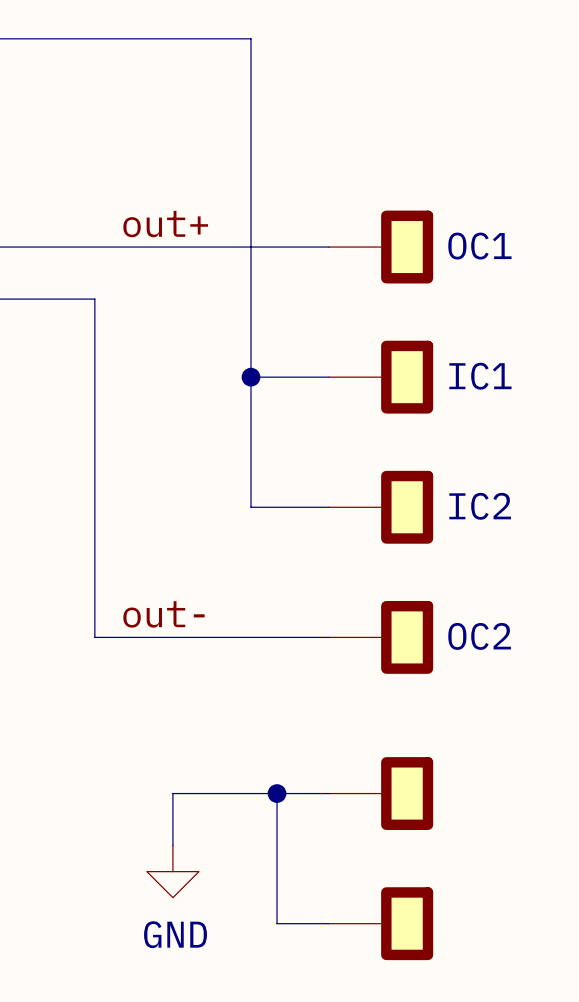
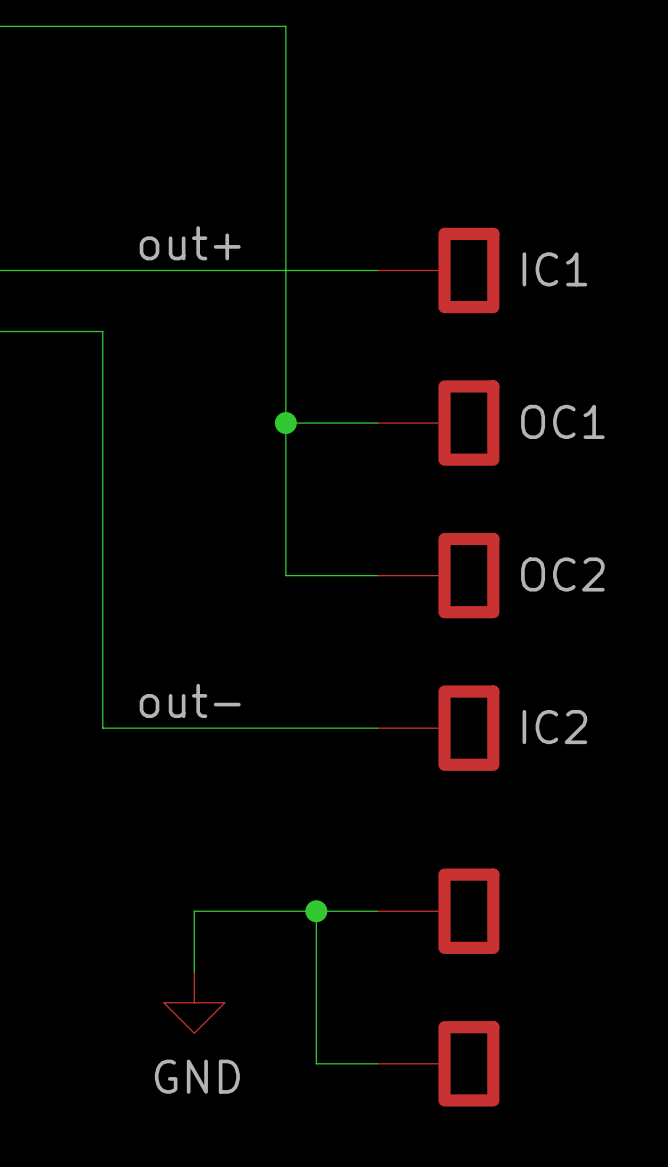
OC1 name: OC1 (479, 246) -> IC1 (554, 269)
IC1 name: IC1 (480, 376) -> OC1 (562, 421)
IC2 name: IC2 (480, 506) -> OC2 (562, 574)
OC2 name: OC2 (479, 636) -> IC2 (554, 727)

